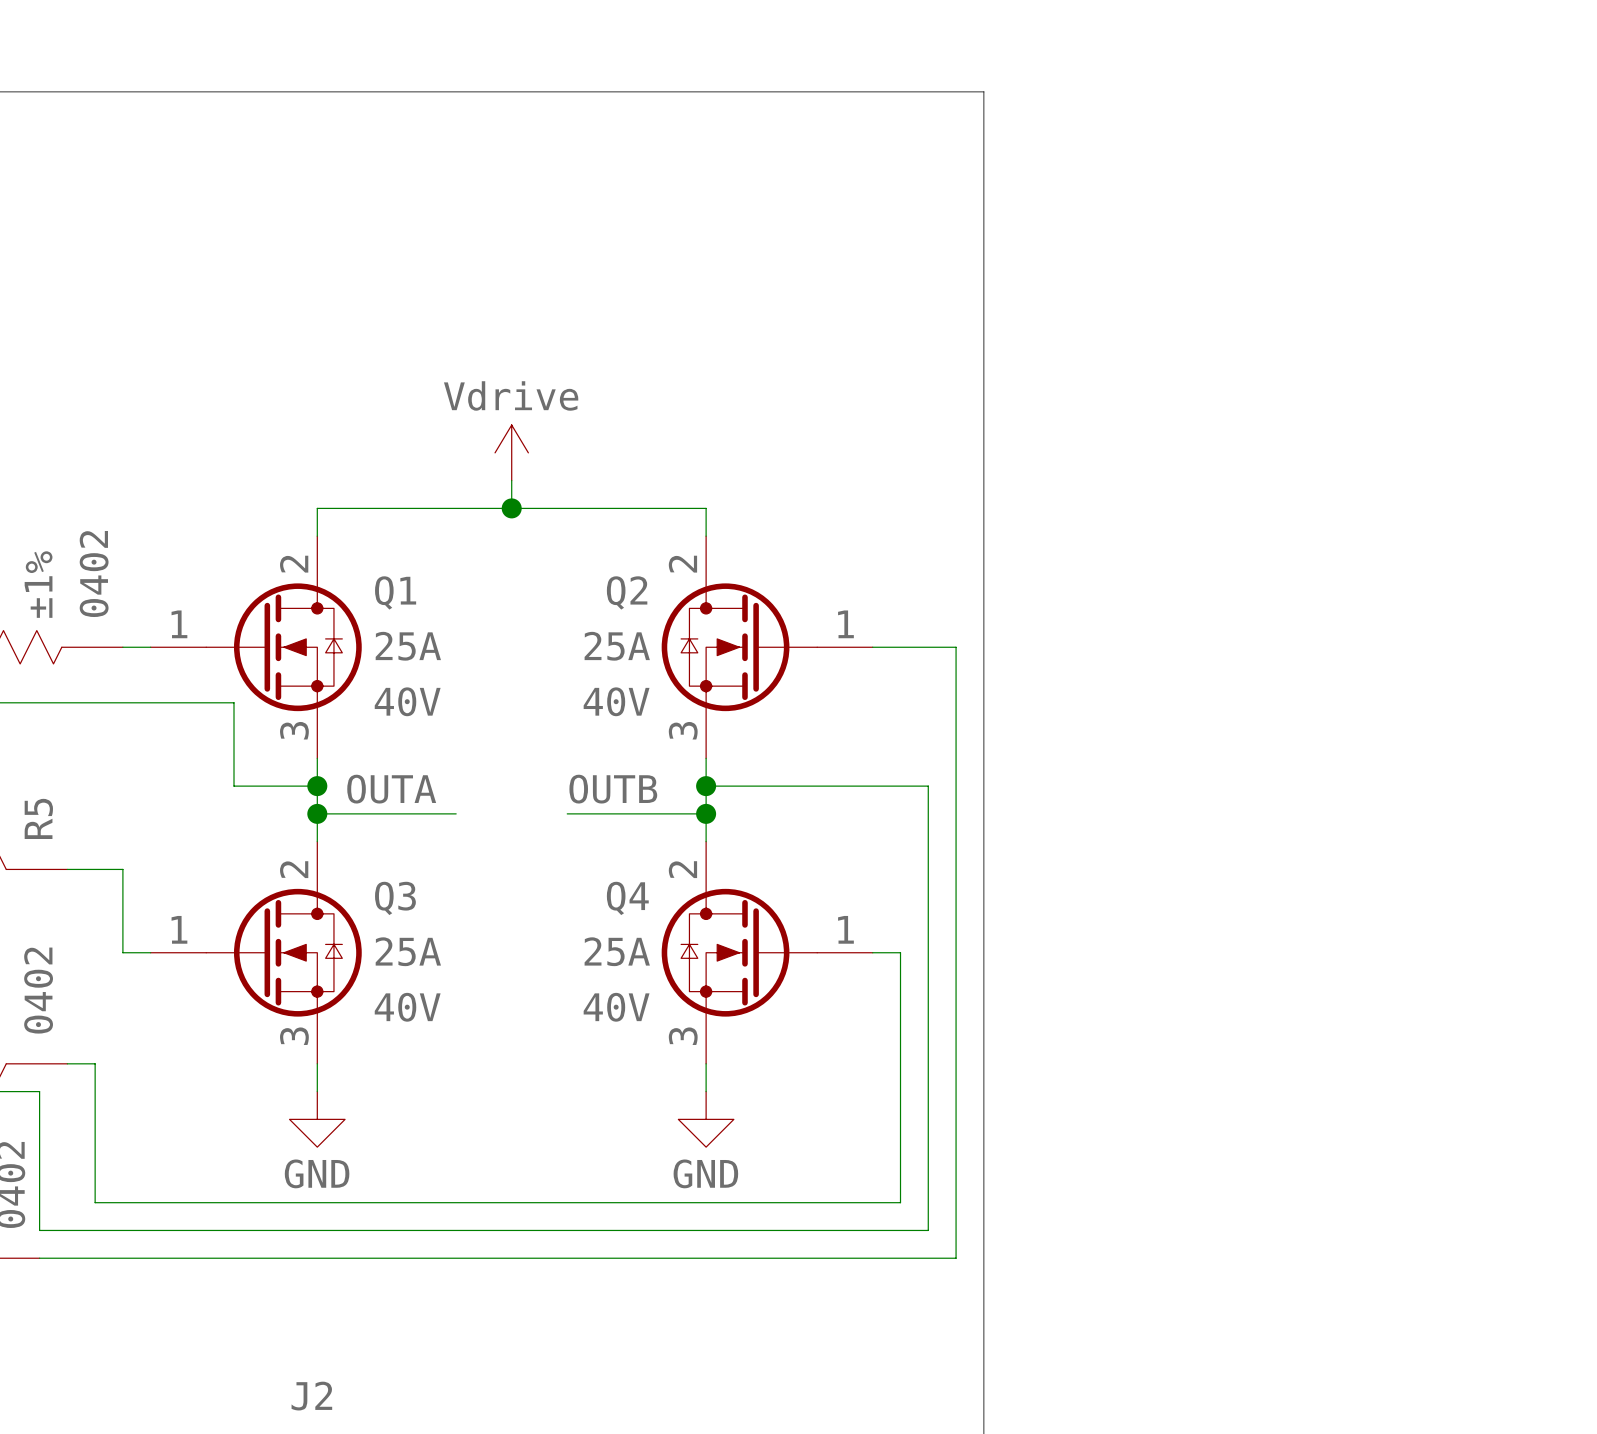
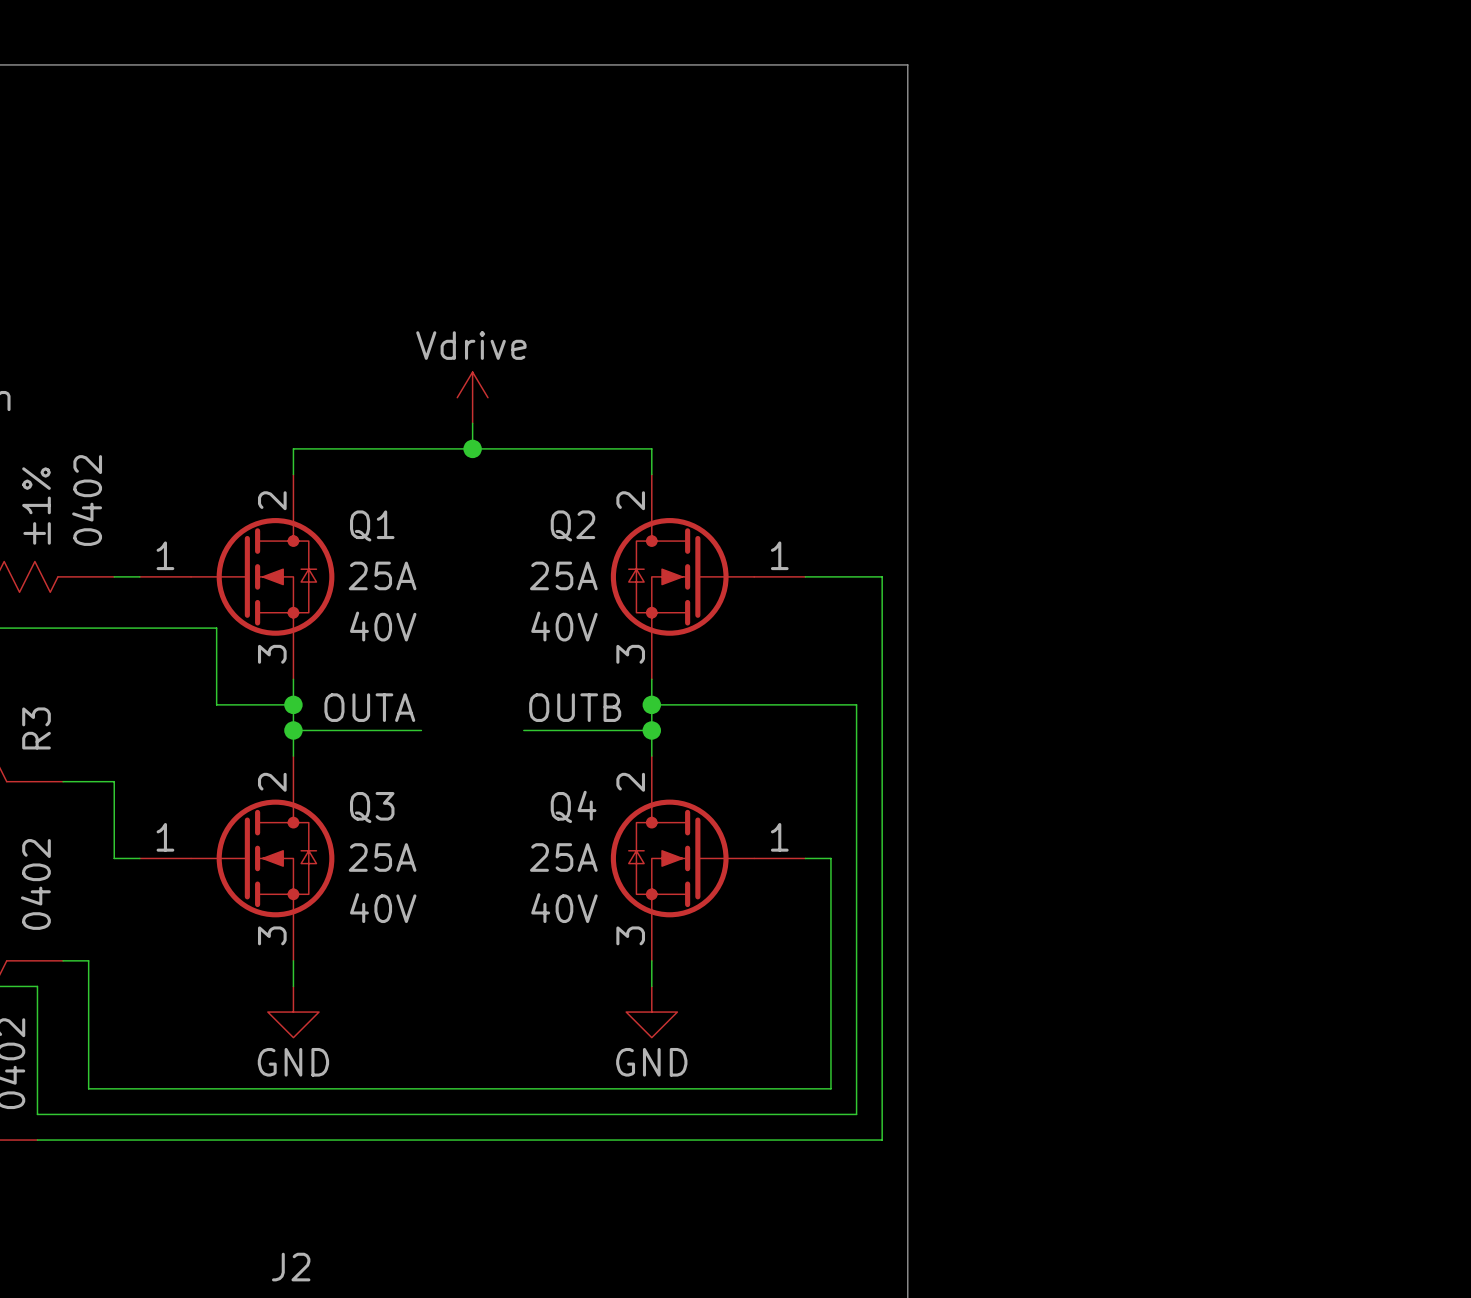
R5 name: R5 (38, 818) -> R3 (36, 728)

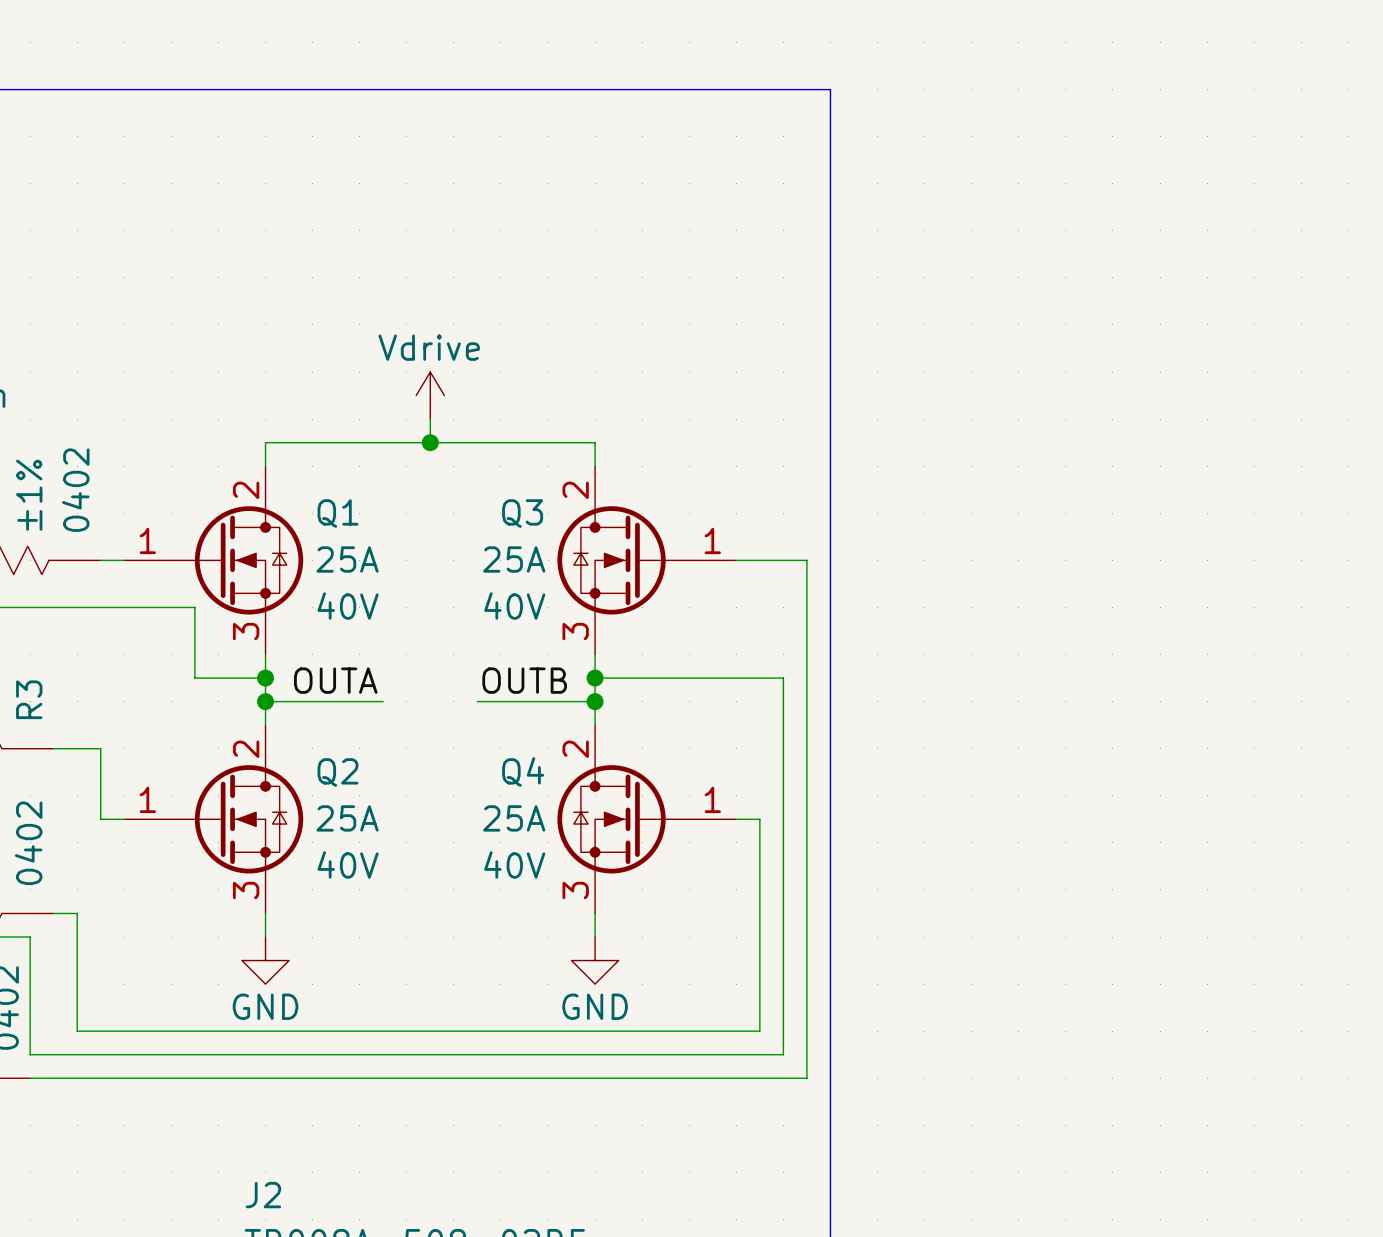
Q2 name: Q2 (572, 525) -> Q3 (522, 513)
Q3 name: Q3 (372, 807) -> Q2 (338, 772)

